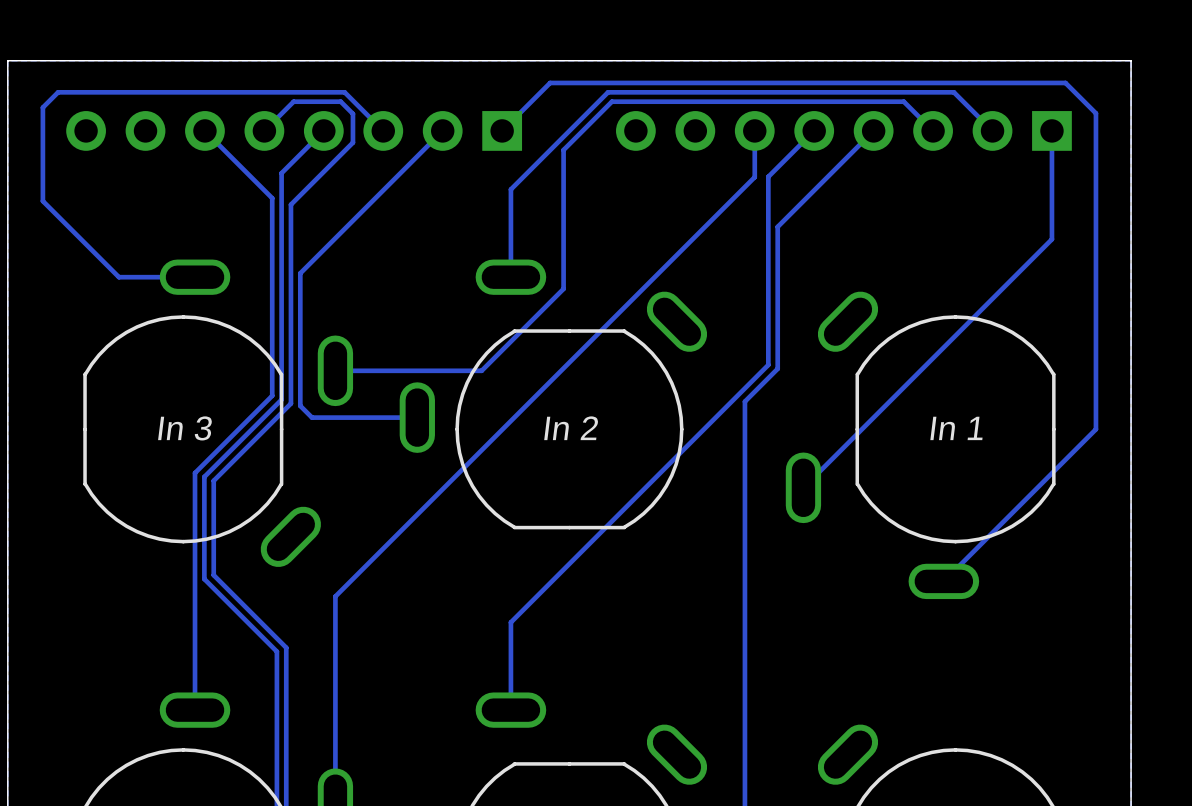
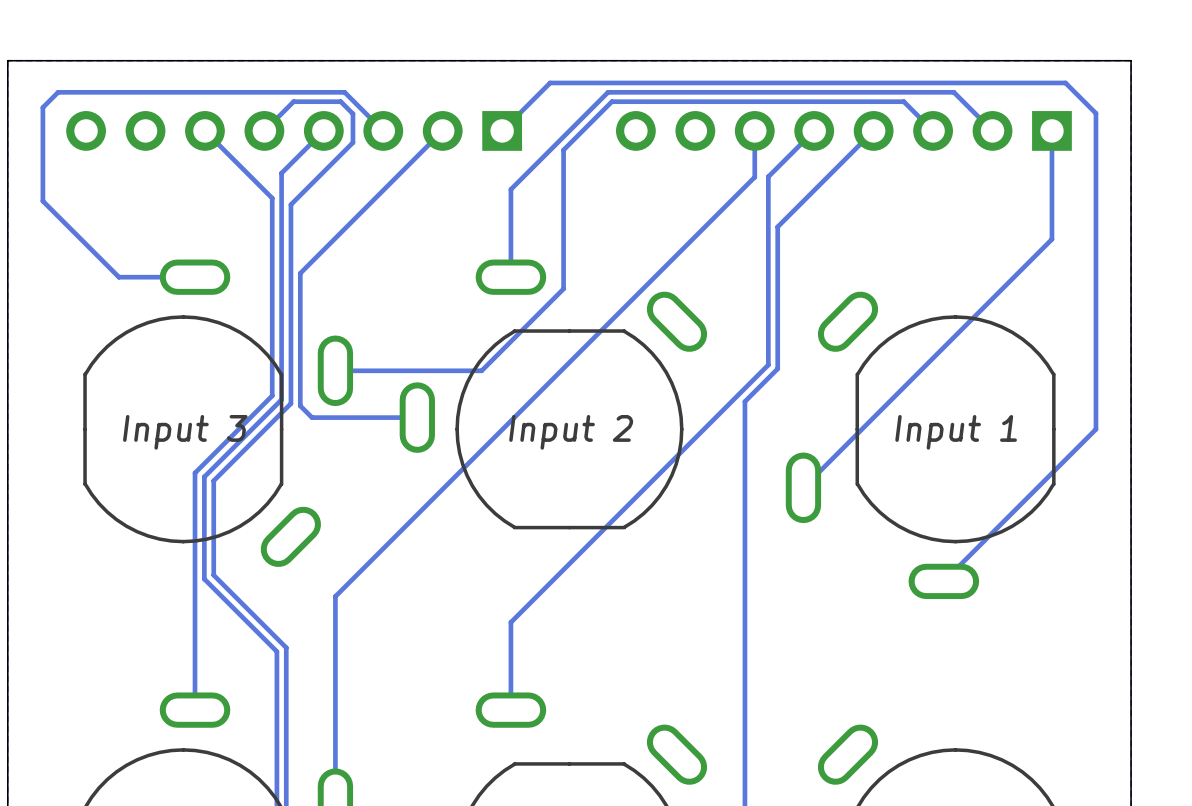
part text: In 3 (185, 428) -> Input 3 (185, 432)
part text: In 2 (571, 428) -> Input 2 (571, 432)
part text: In 1 (956, 428) -> Input 1 (956, 432)

